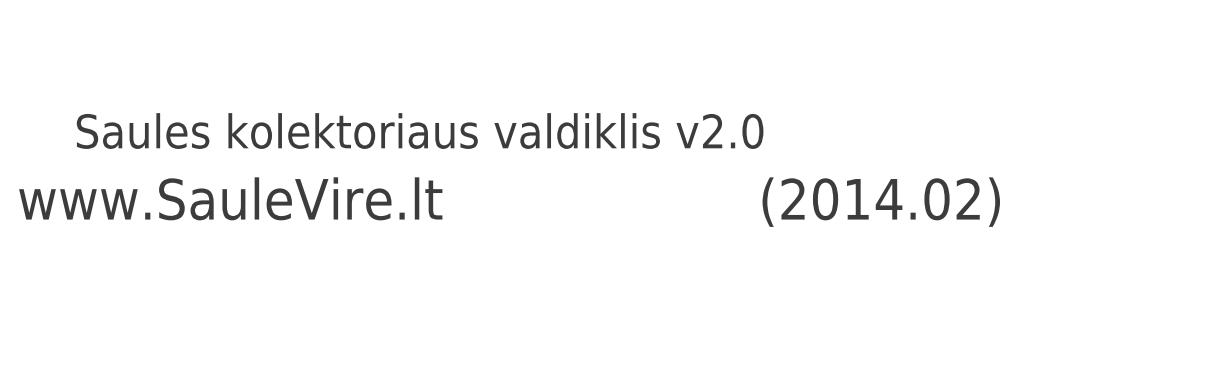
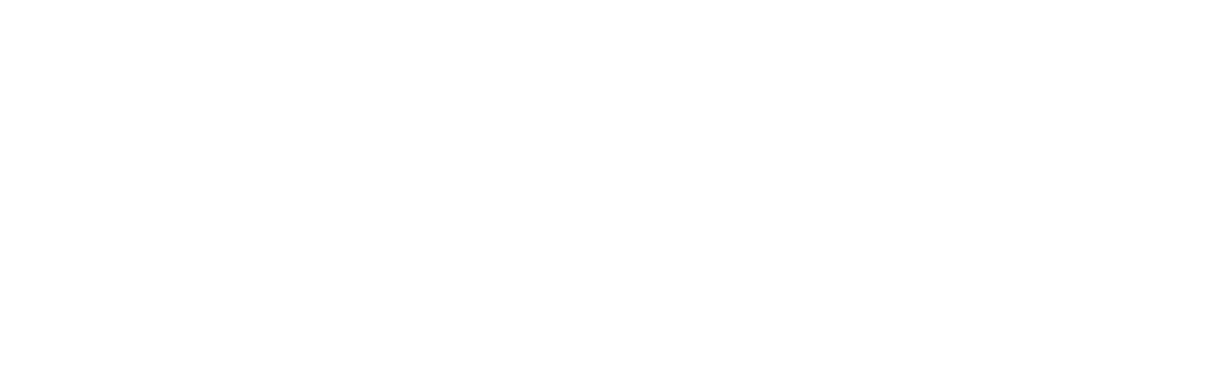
text: Saules kolektoriaus valdiklis v2.0 (420, 131) -> none
text: www.SauleVire.lt (230, 198) -> none
text: (2014.02) (881, 202) -> none

